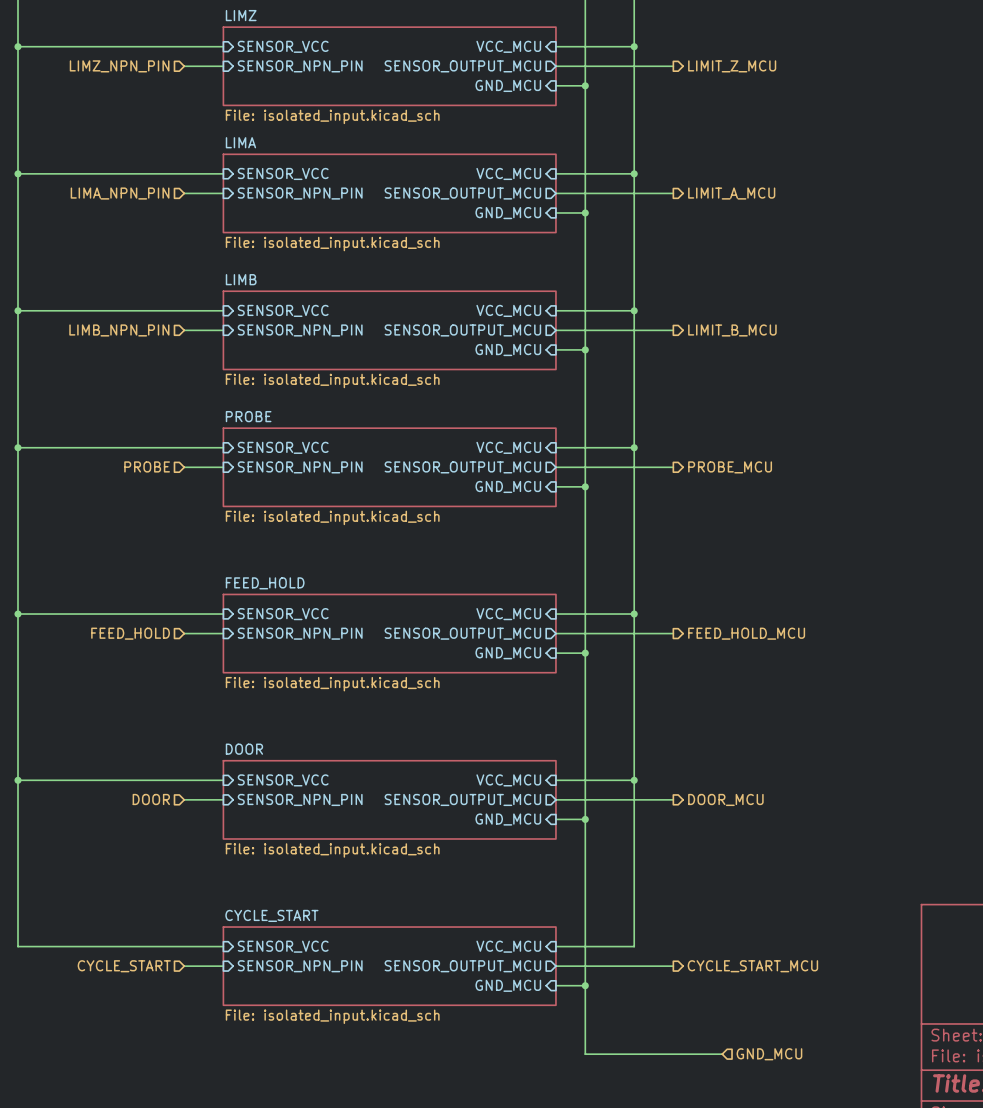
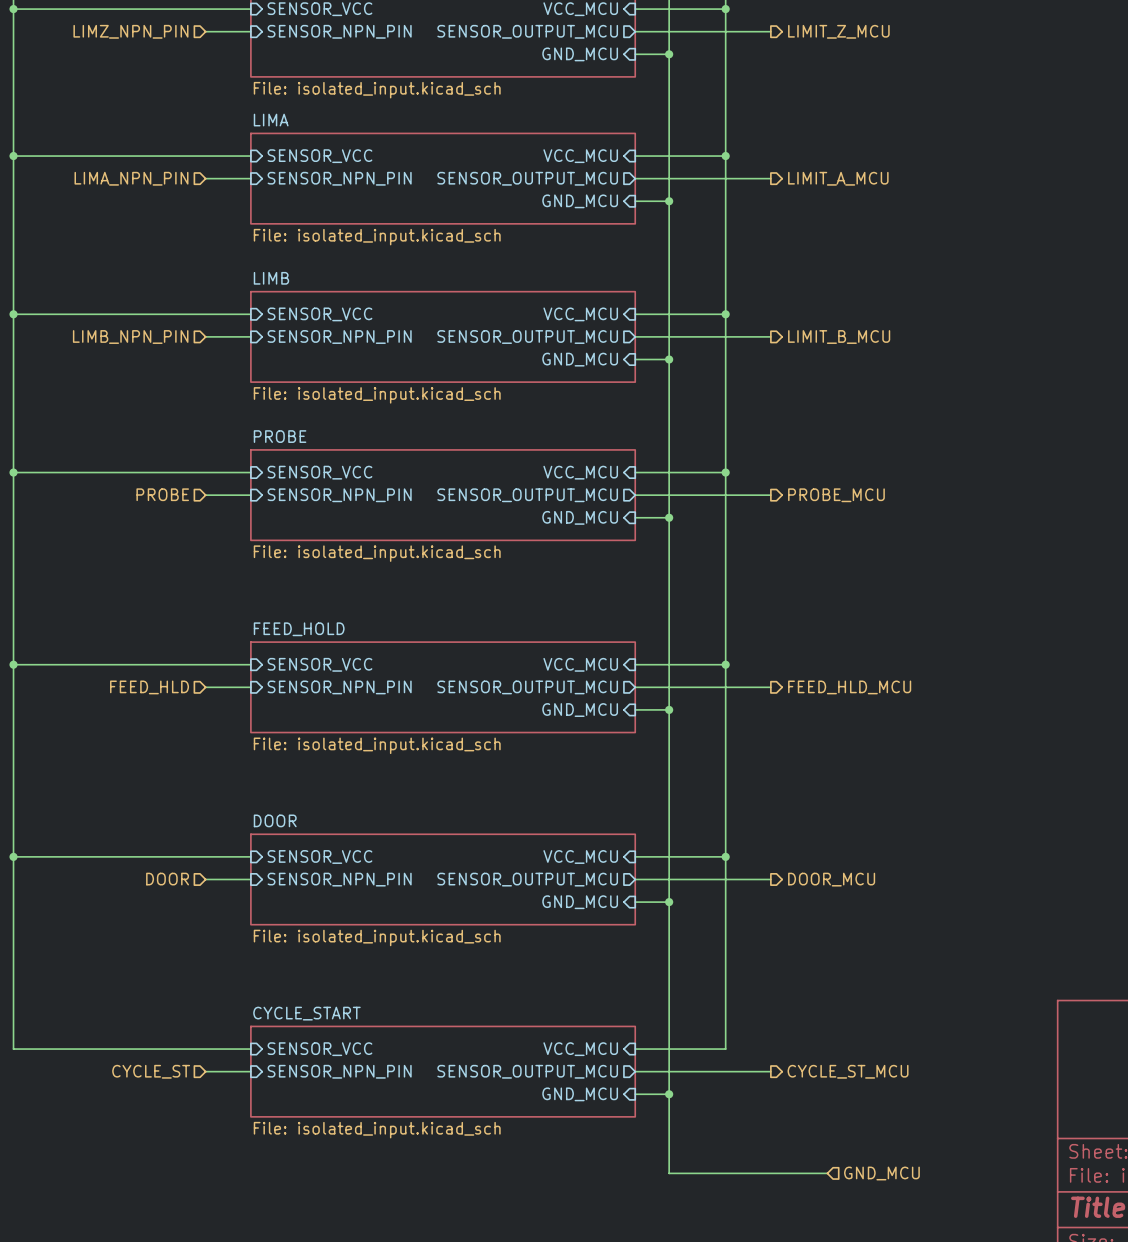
hierarchical label: FEED_HOLD (130, 633) -> FEED_HLD (149, 687)
hierarchical label: FEED_HOLD_MCU (746, 633) -> FEED_HLD_MCU (849, 687)
hierarchical label: CYCLE_START (124, 966) -> CYCLE_ST (151, 1071)
hierarchical label: CYCLE_START_MCU (752, 966) -> CYCLE_ST_MCU (848, 1071)

